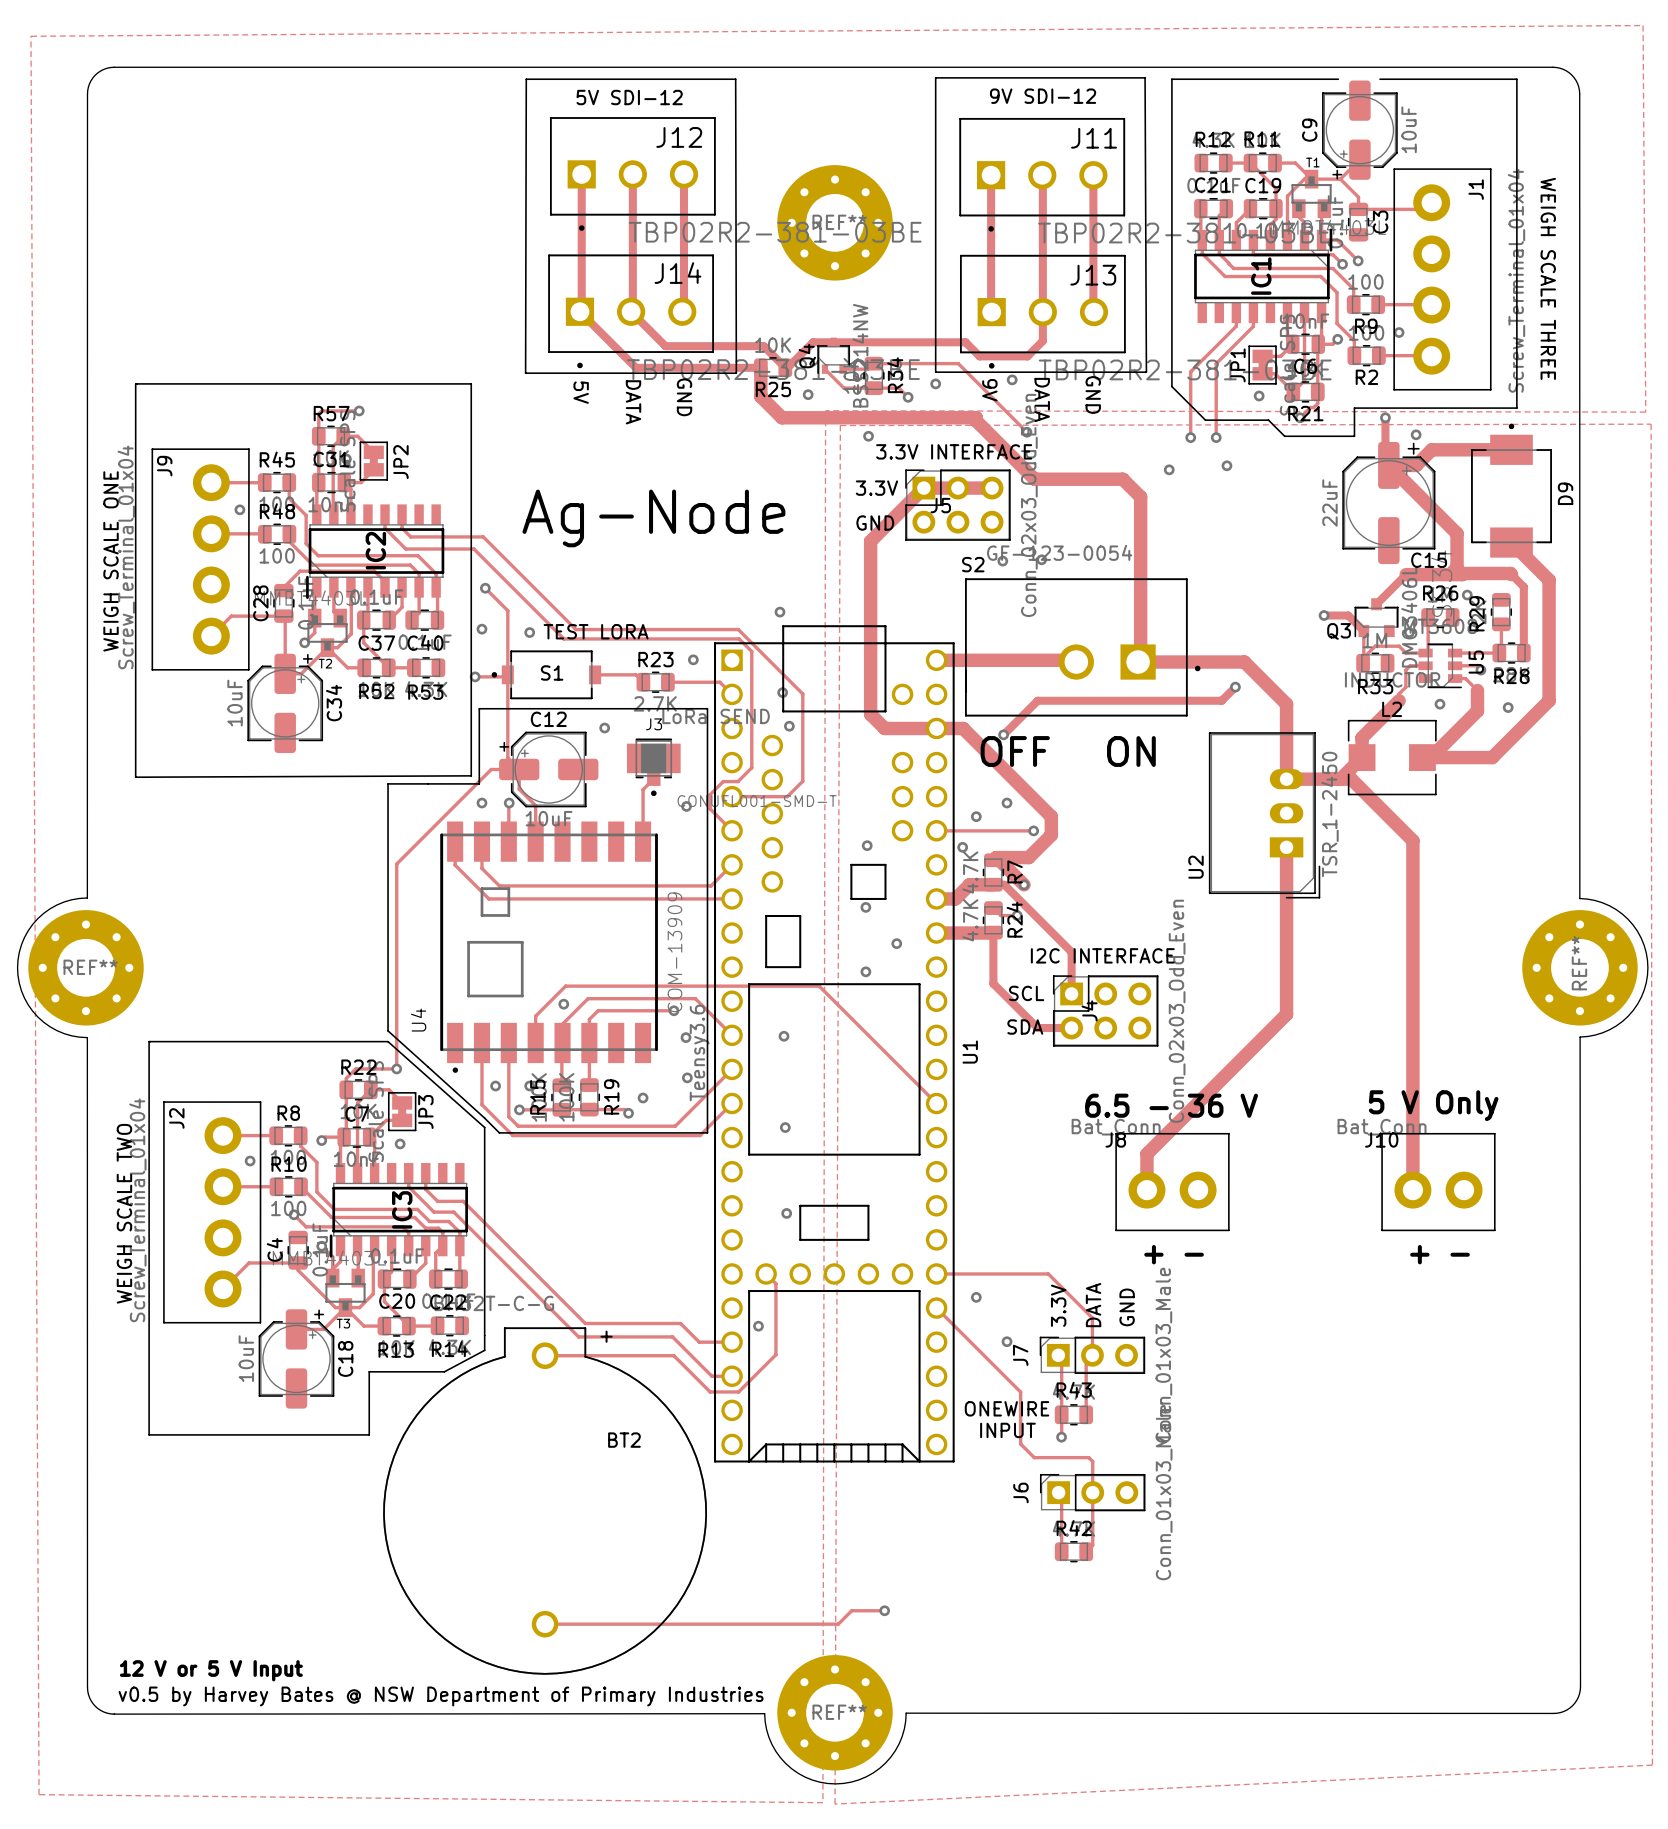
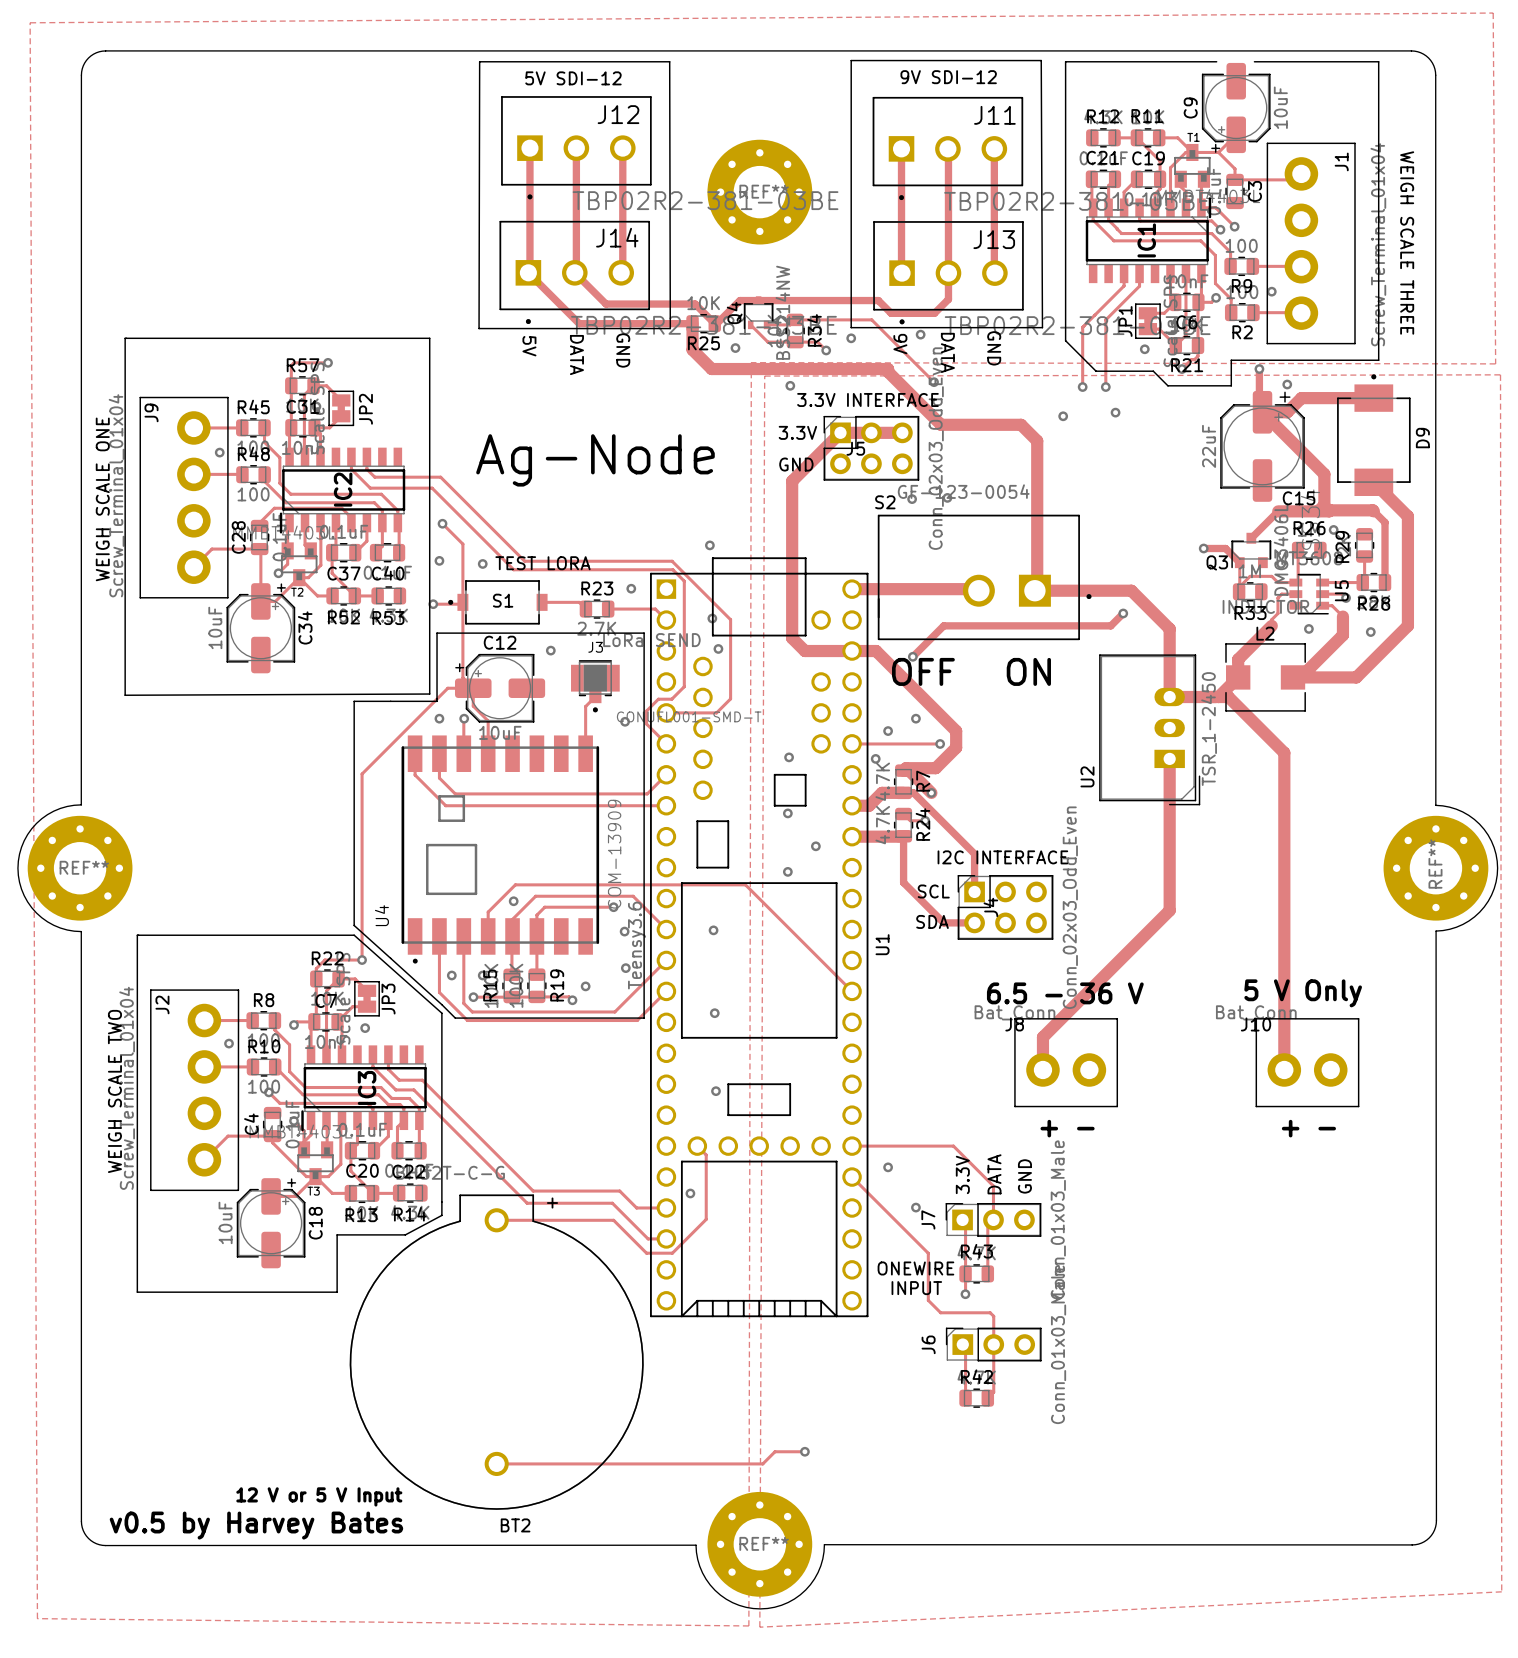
BT2 name position: BT2 (624, 1440) -> BT2 (515, 1525)
text position: 12 V or 5 V Input (211, 1670) -> 12 V or 5 V Input (319, 1496)
text: none -> v0.5 by Harvey Bates (256, 1525)
text: v0.5 by Harvey Bates @ NSW Department of Primary Industries (441, 1696) -> none

